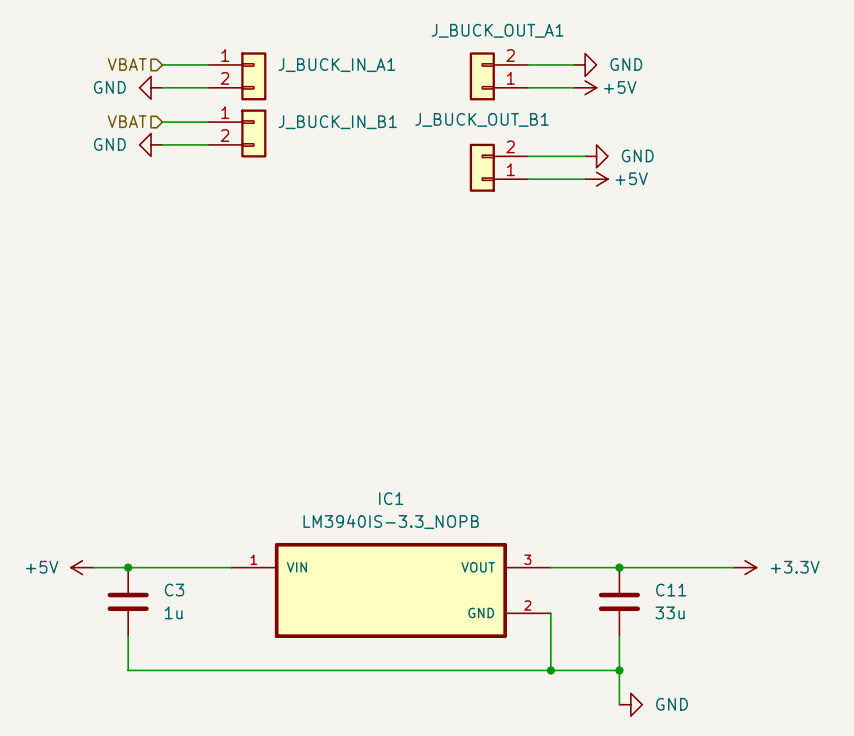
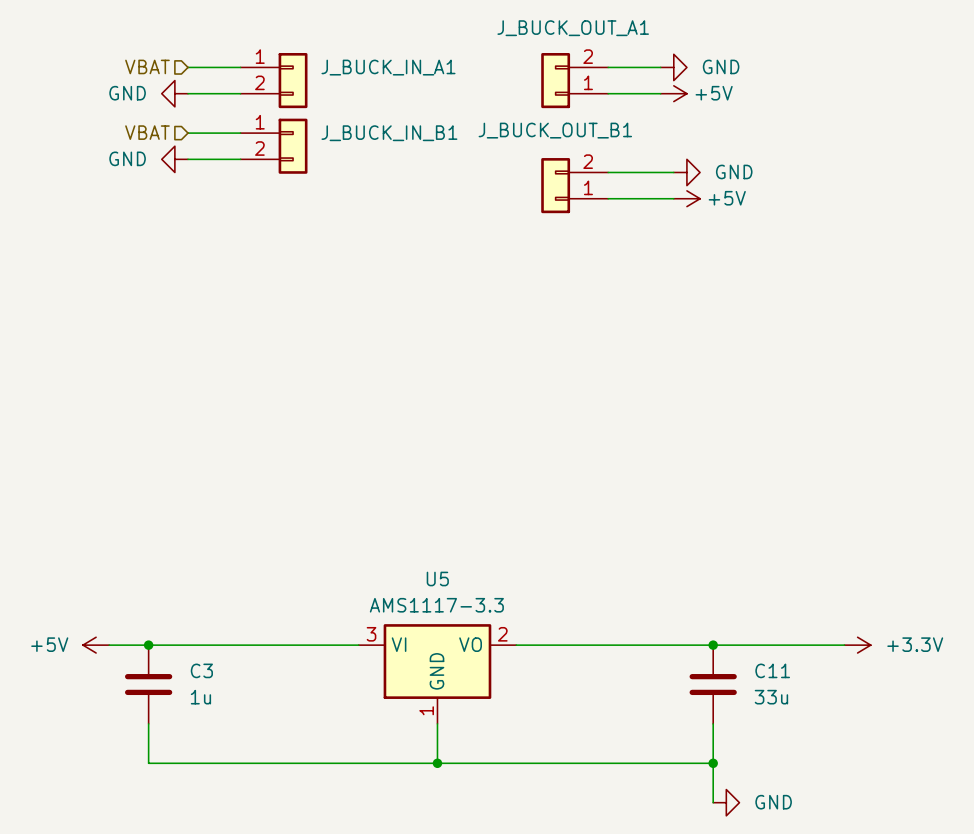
IC1: LM3940IS-3.3_NOPB (390, 590) -> none
U5: none -> AMS1117-3.3 (437, 674)
wire: (550, 613) (550, 670) -> none
wire: none -> (437, 723) (437, 763)
junction: none -> (437, 763)
junction: (550, 670) -> none

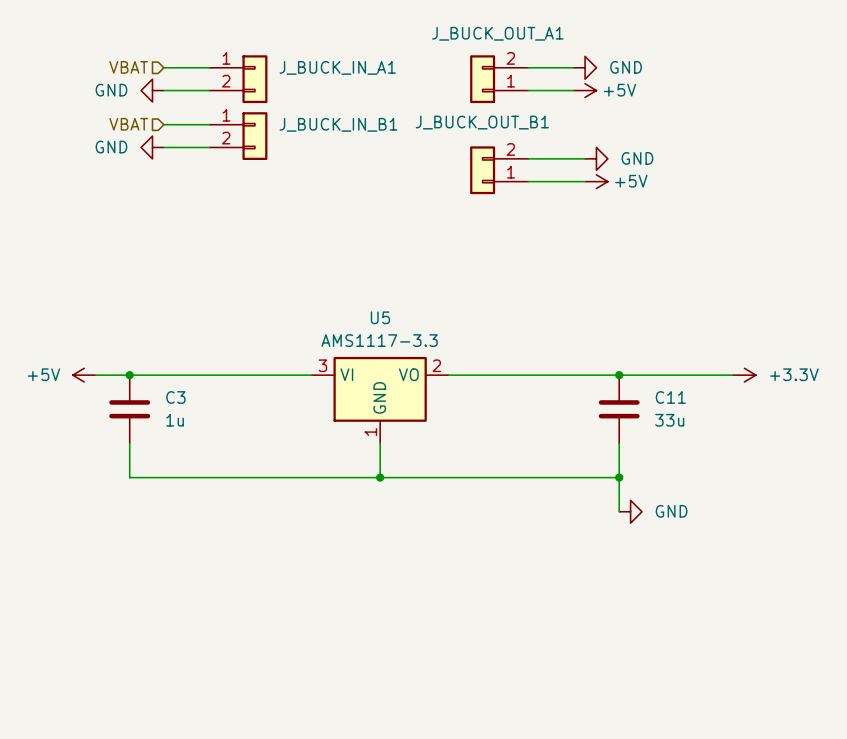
junction: none -> (129, 375)
junction: none -> (619, 375)
junction: none -> (380, 477)
junction: none -> (619, 477)
power symbol position: +5V (96, 645) -> +5V (84, 375)
wire: (109, 645) (358, 645) -> (95, 375) (311, 375)
junction: (148, 645) -> none
wire: (516, 645) (844, 645) -> (448, 375) (733, 375)
junction: (713, 645) -> none
power symbol position: +3.3V (857, 645) -> +3.3V (744, 375)
U5 position: (437, 674) -> (380, 400)
C3 position: (148, 684) -> (129, 409)
C11 position: (713, 684) -> (619, 409)
wire: (148, 723) (148, 763) (713, 763) -> (129, 443) (129, 477) (619, 477)
wire: (437, 723) (437, 763) -> (380, 443) (380, 477)
wire: (713, 723) (713, 802) -> (619, 443) (619, 511)
junction: (437, 763) -> none
junction: (713, 763) -> none
power symbol position: GND (726, 802) -> GND (630, 511)

